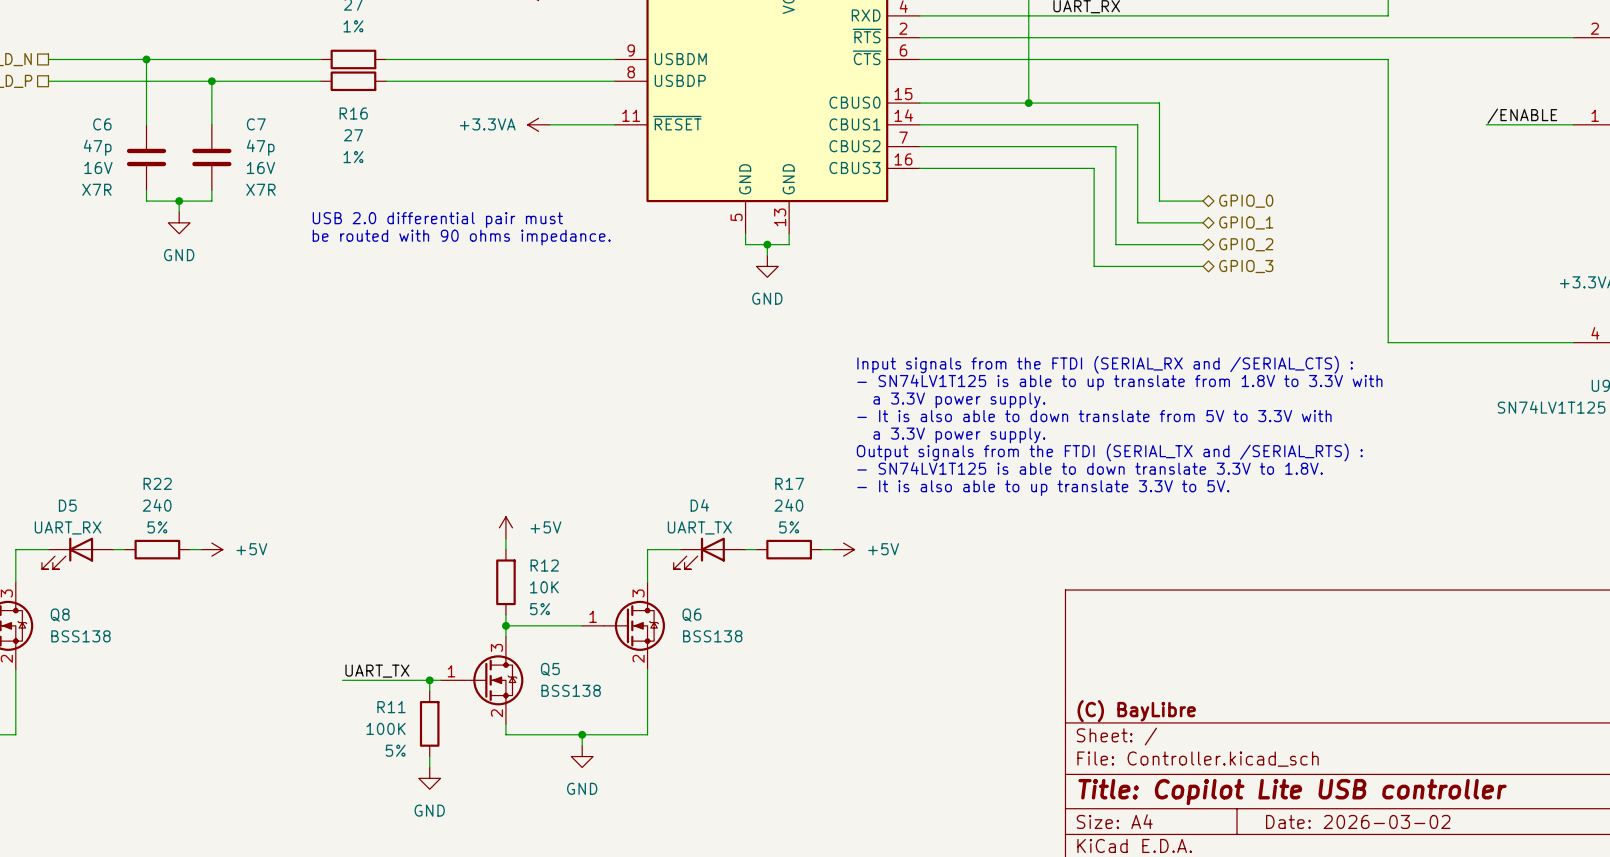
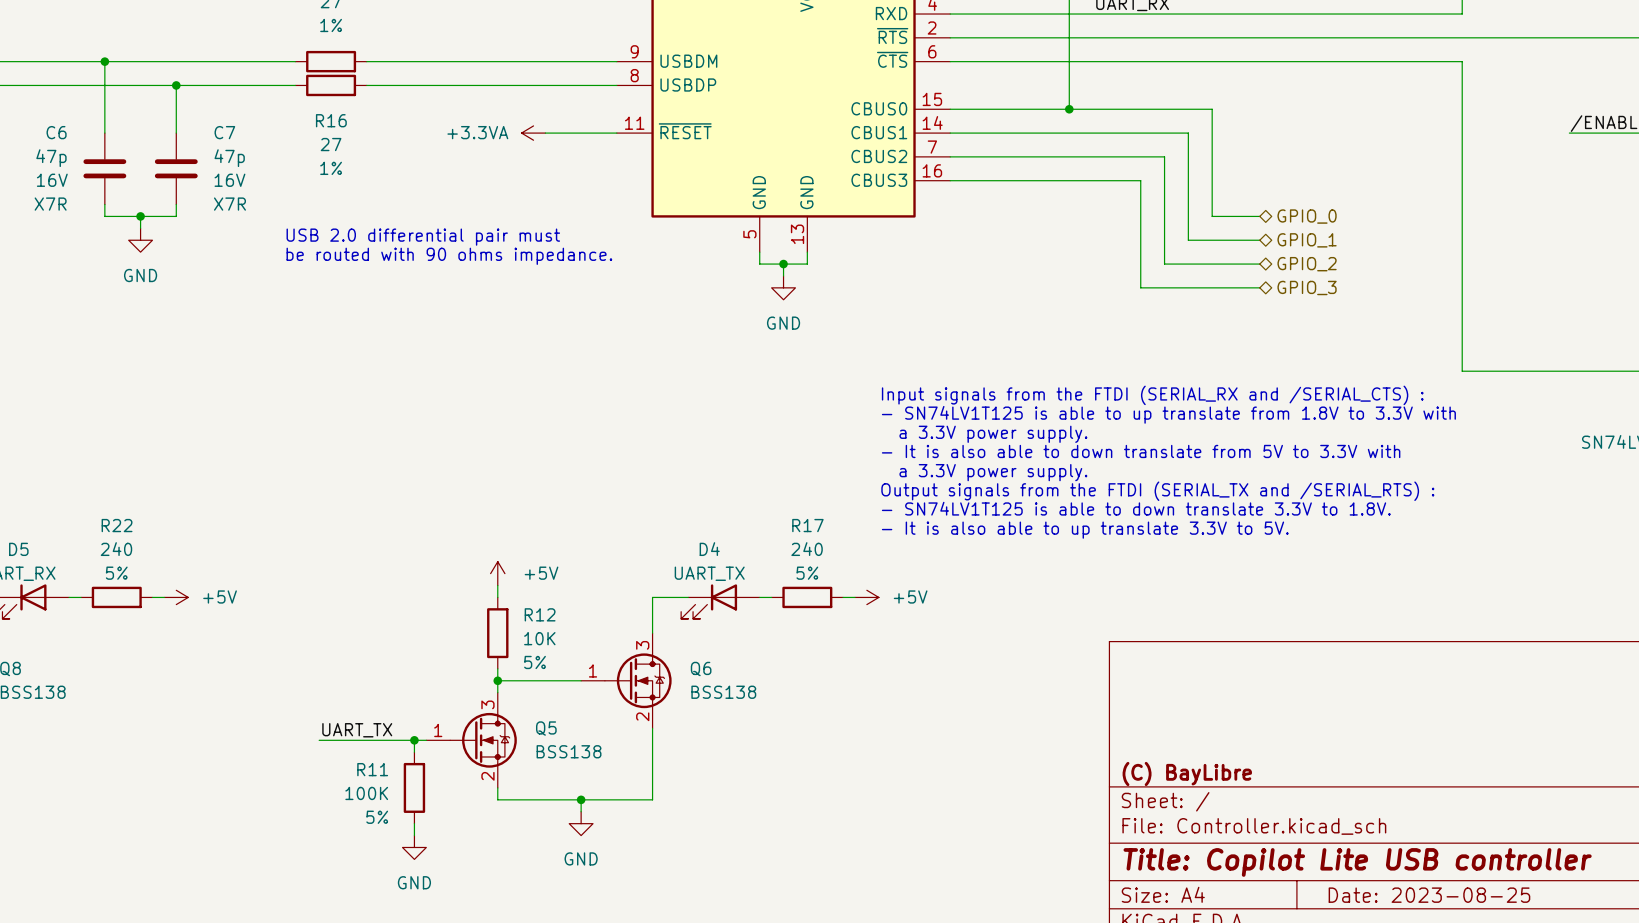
title block: Date: 2026-03-02 (1358, 821) -> Date: 2023-08-25 (1429, 895)

